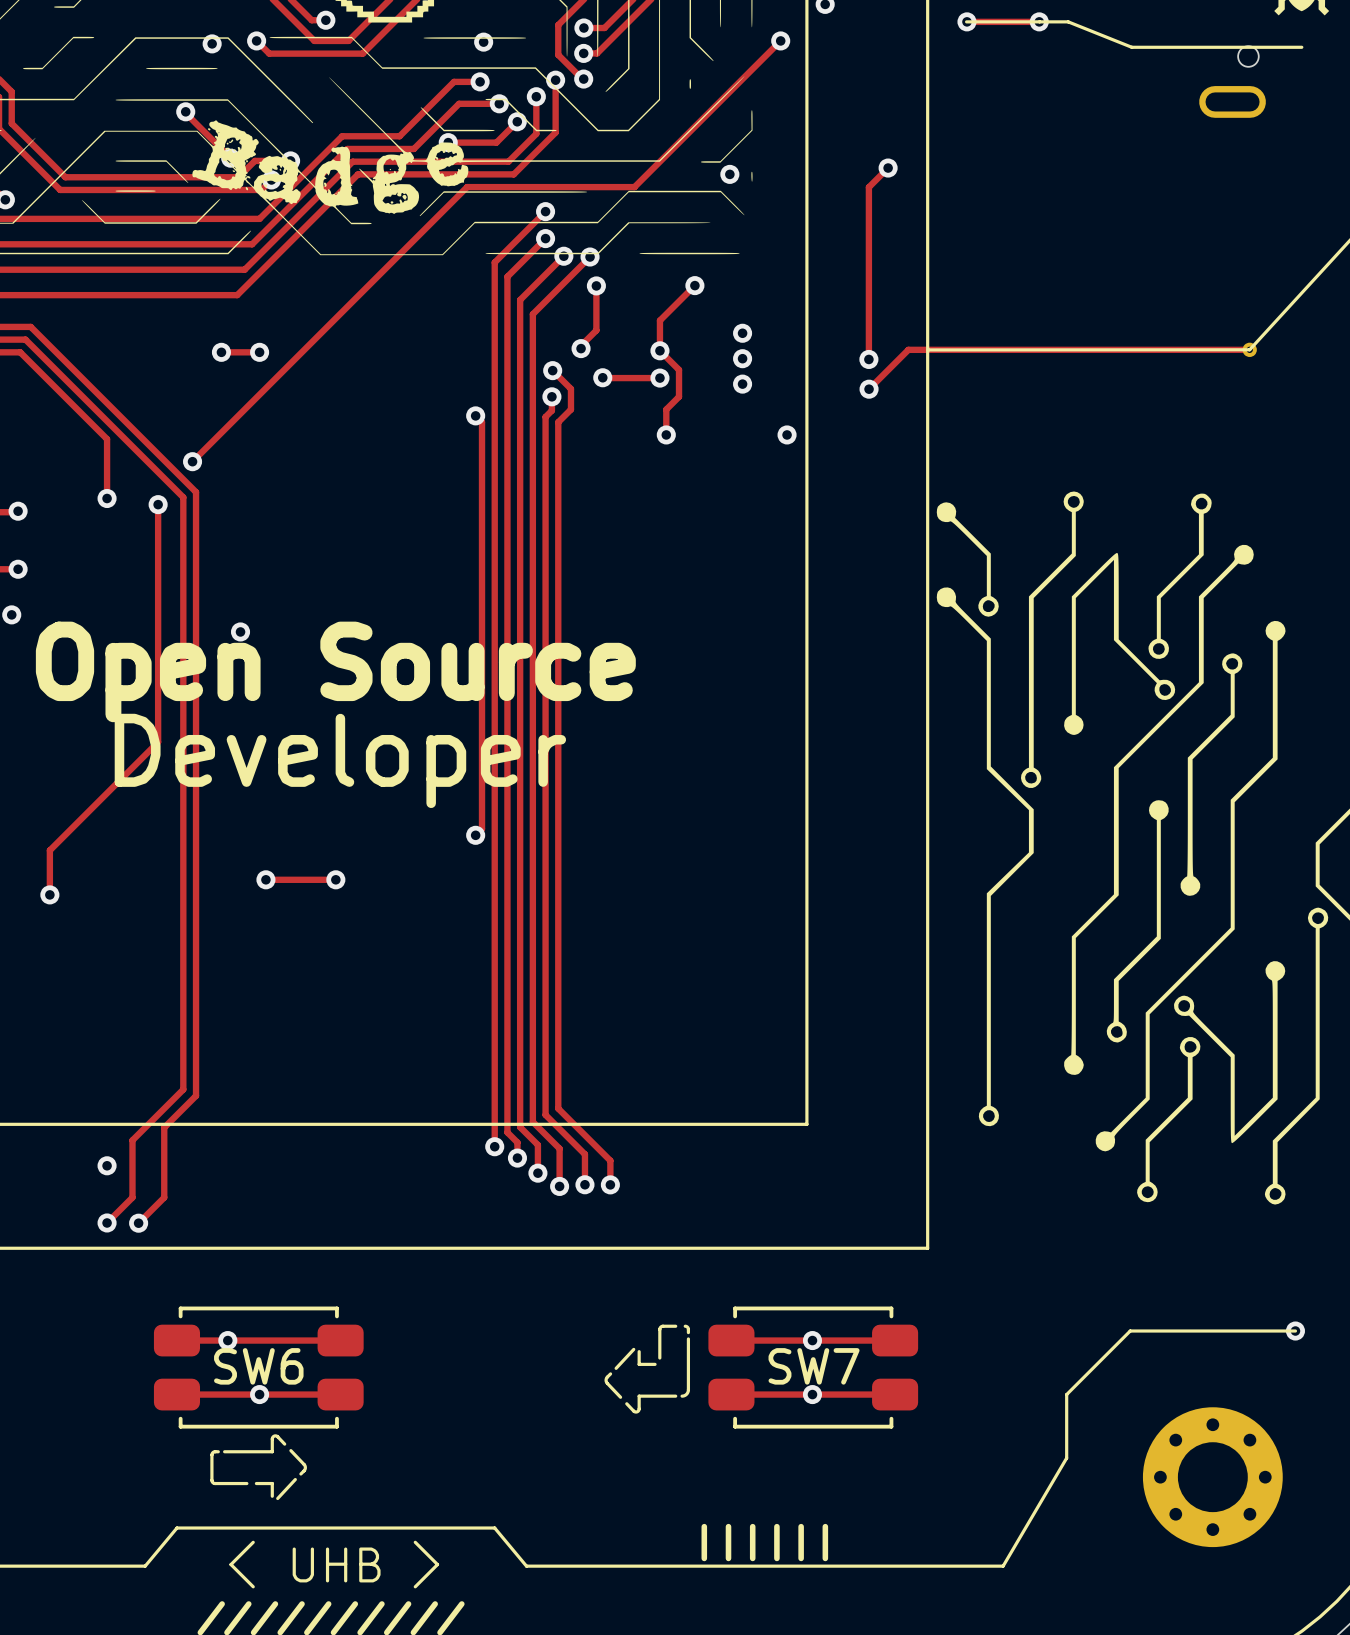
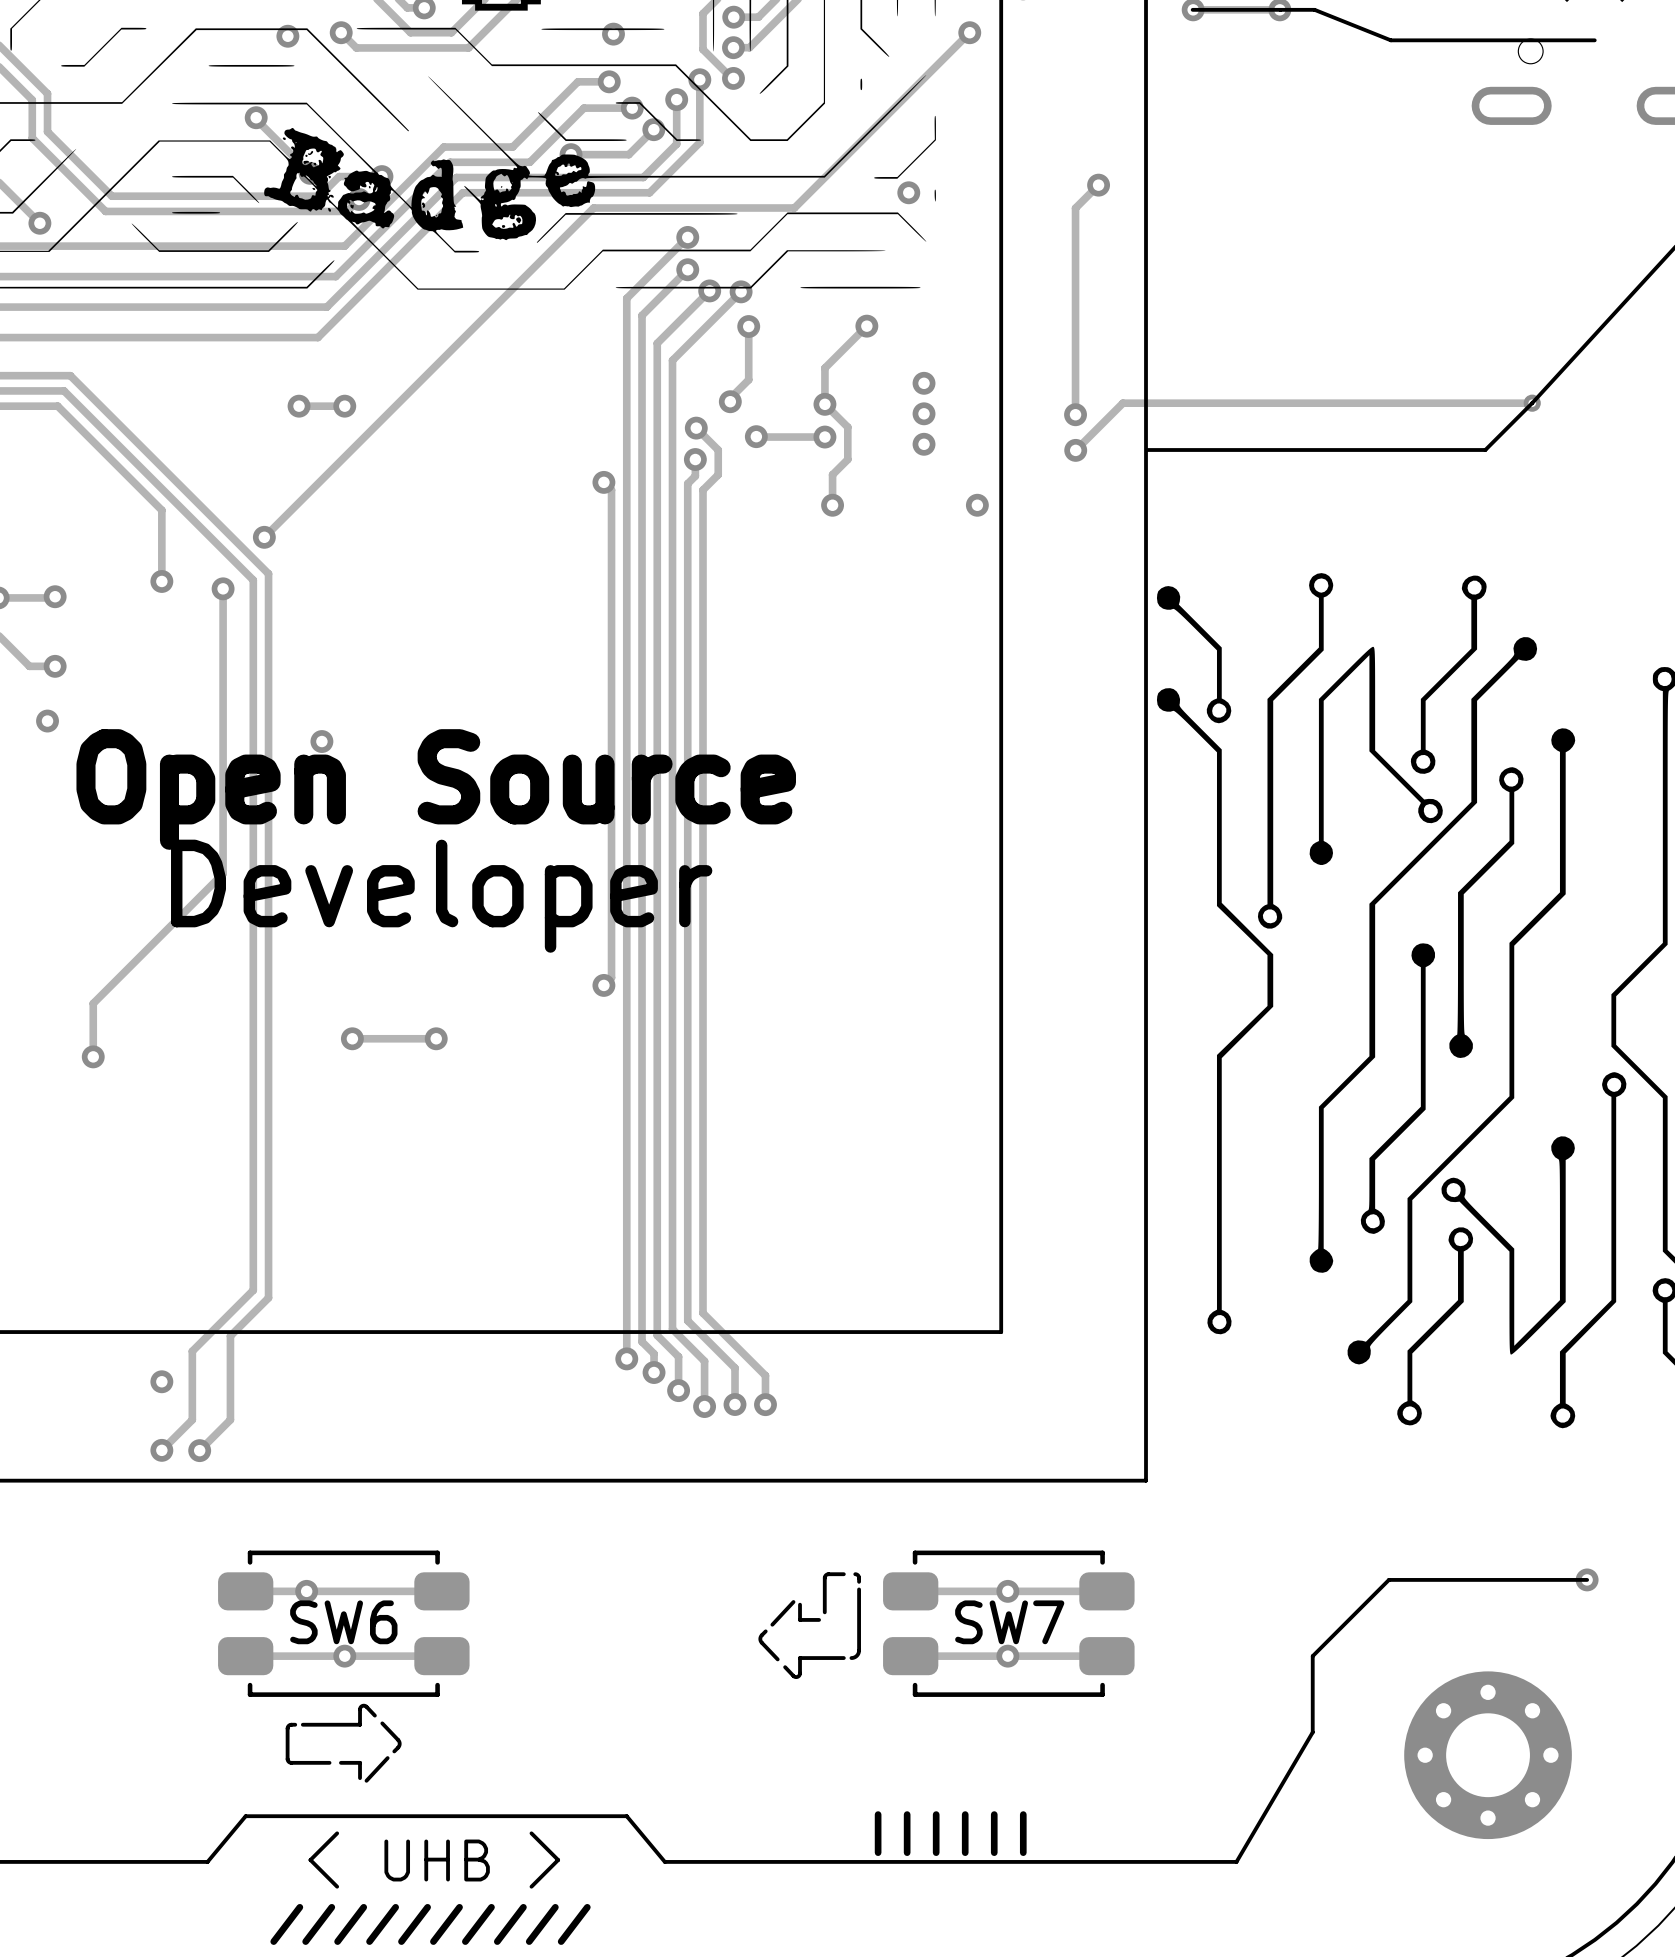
line: (928, 349) (1249, 349) -> (1146, 450) (1485, 450) (1532, 403)

